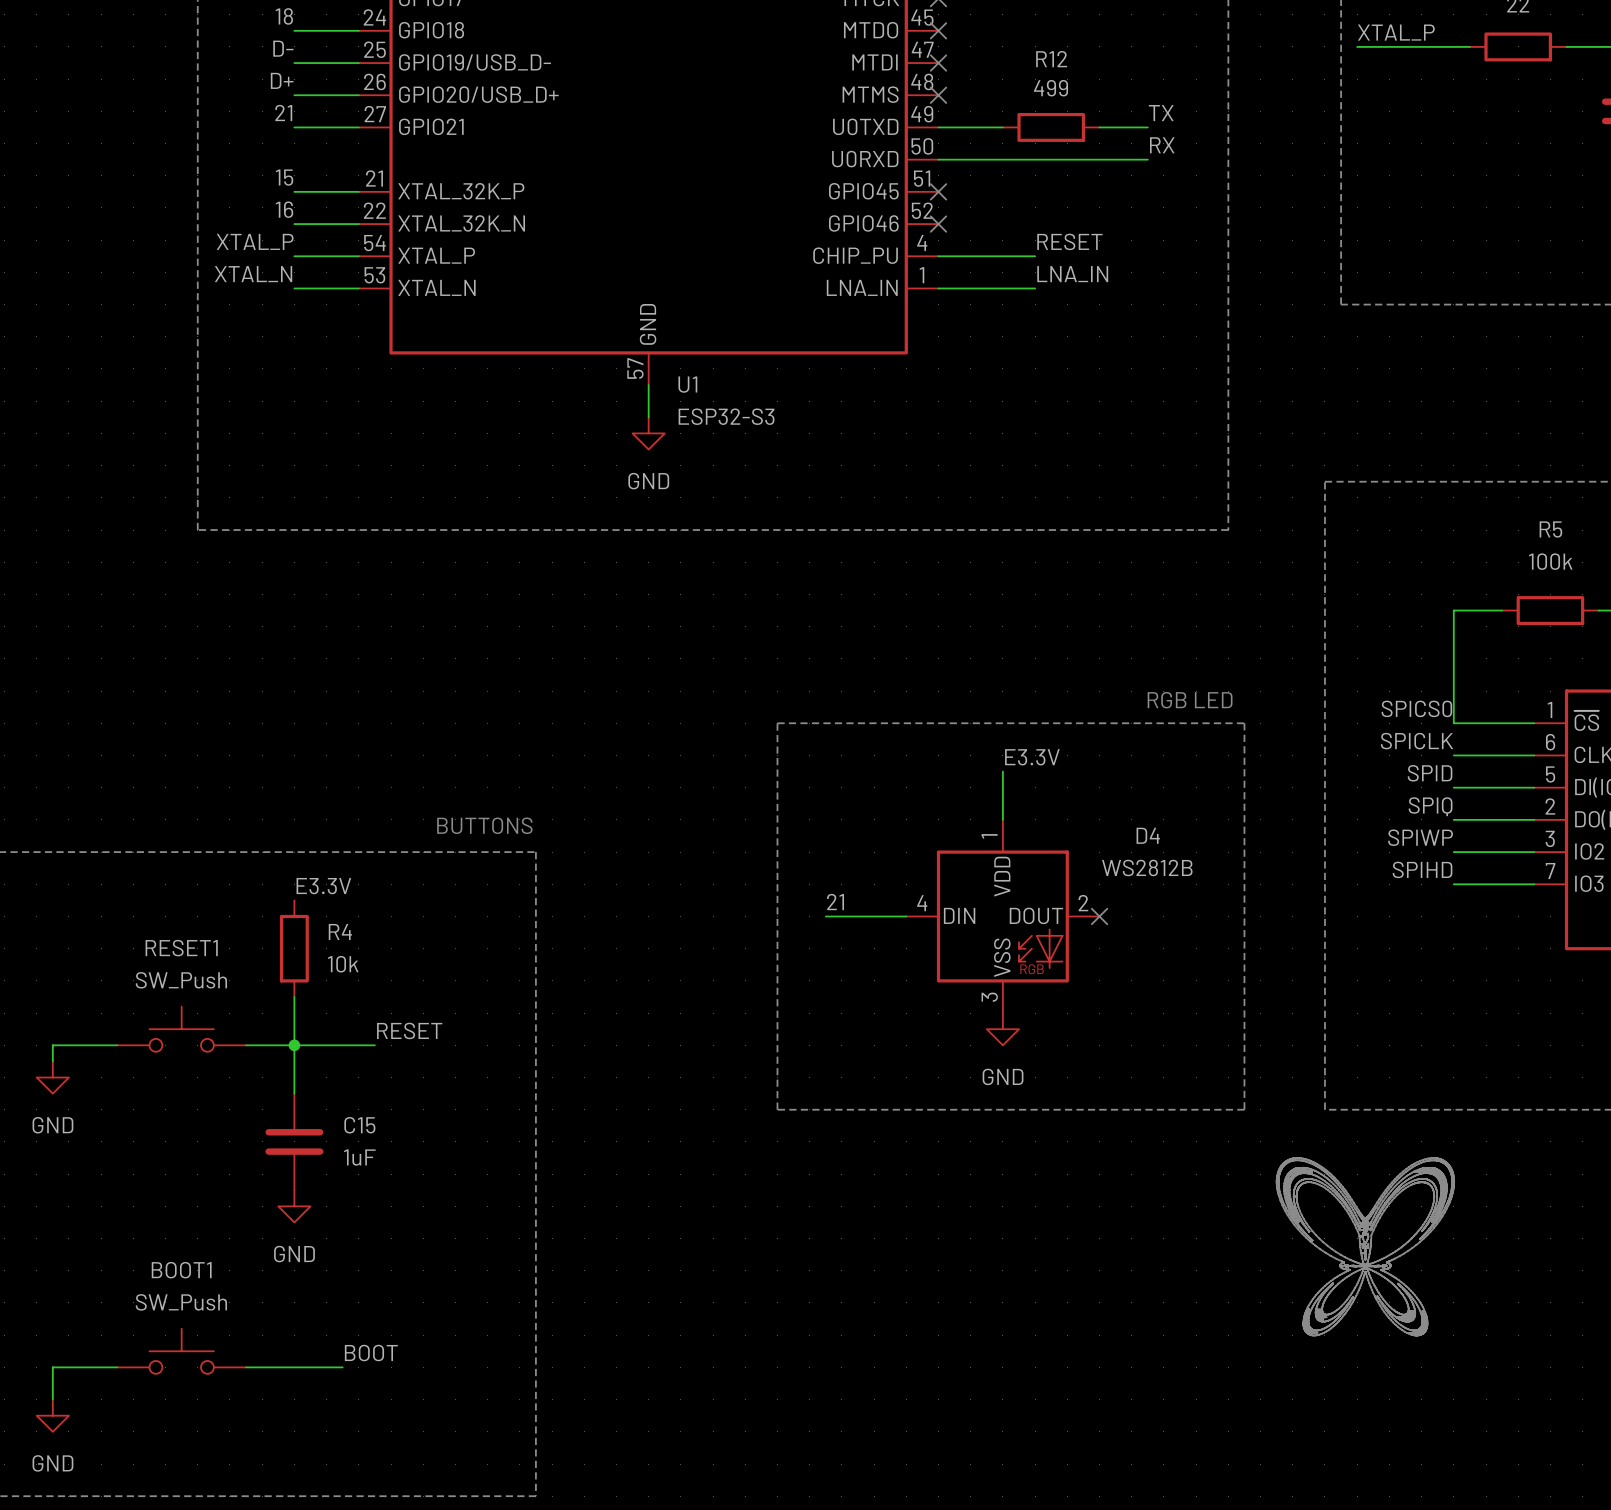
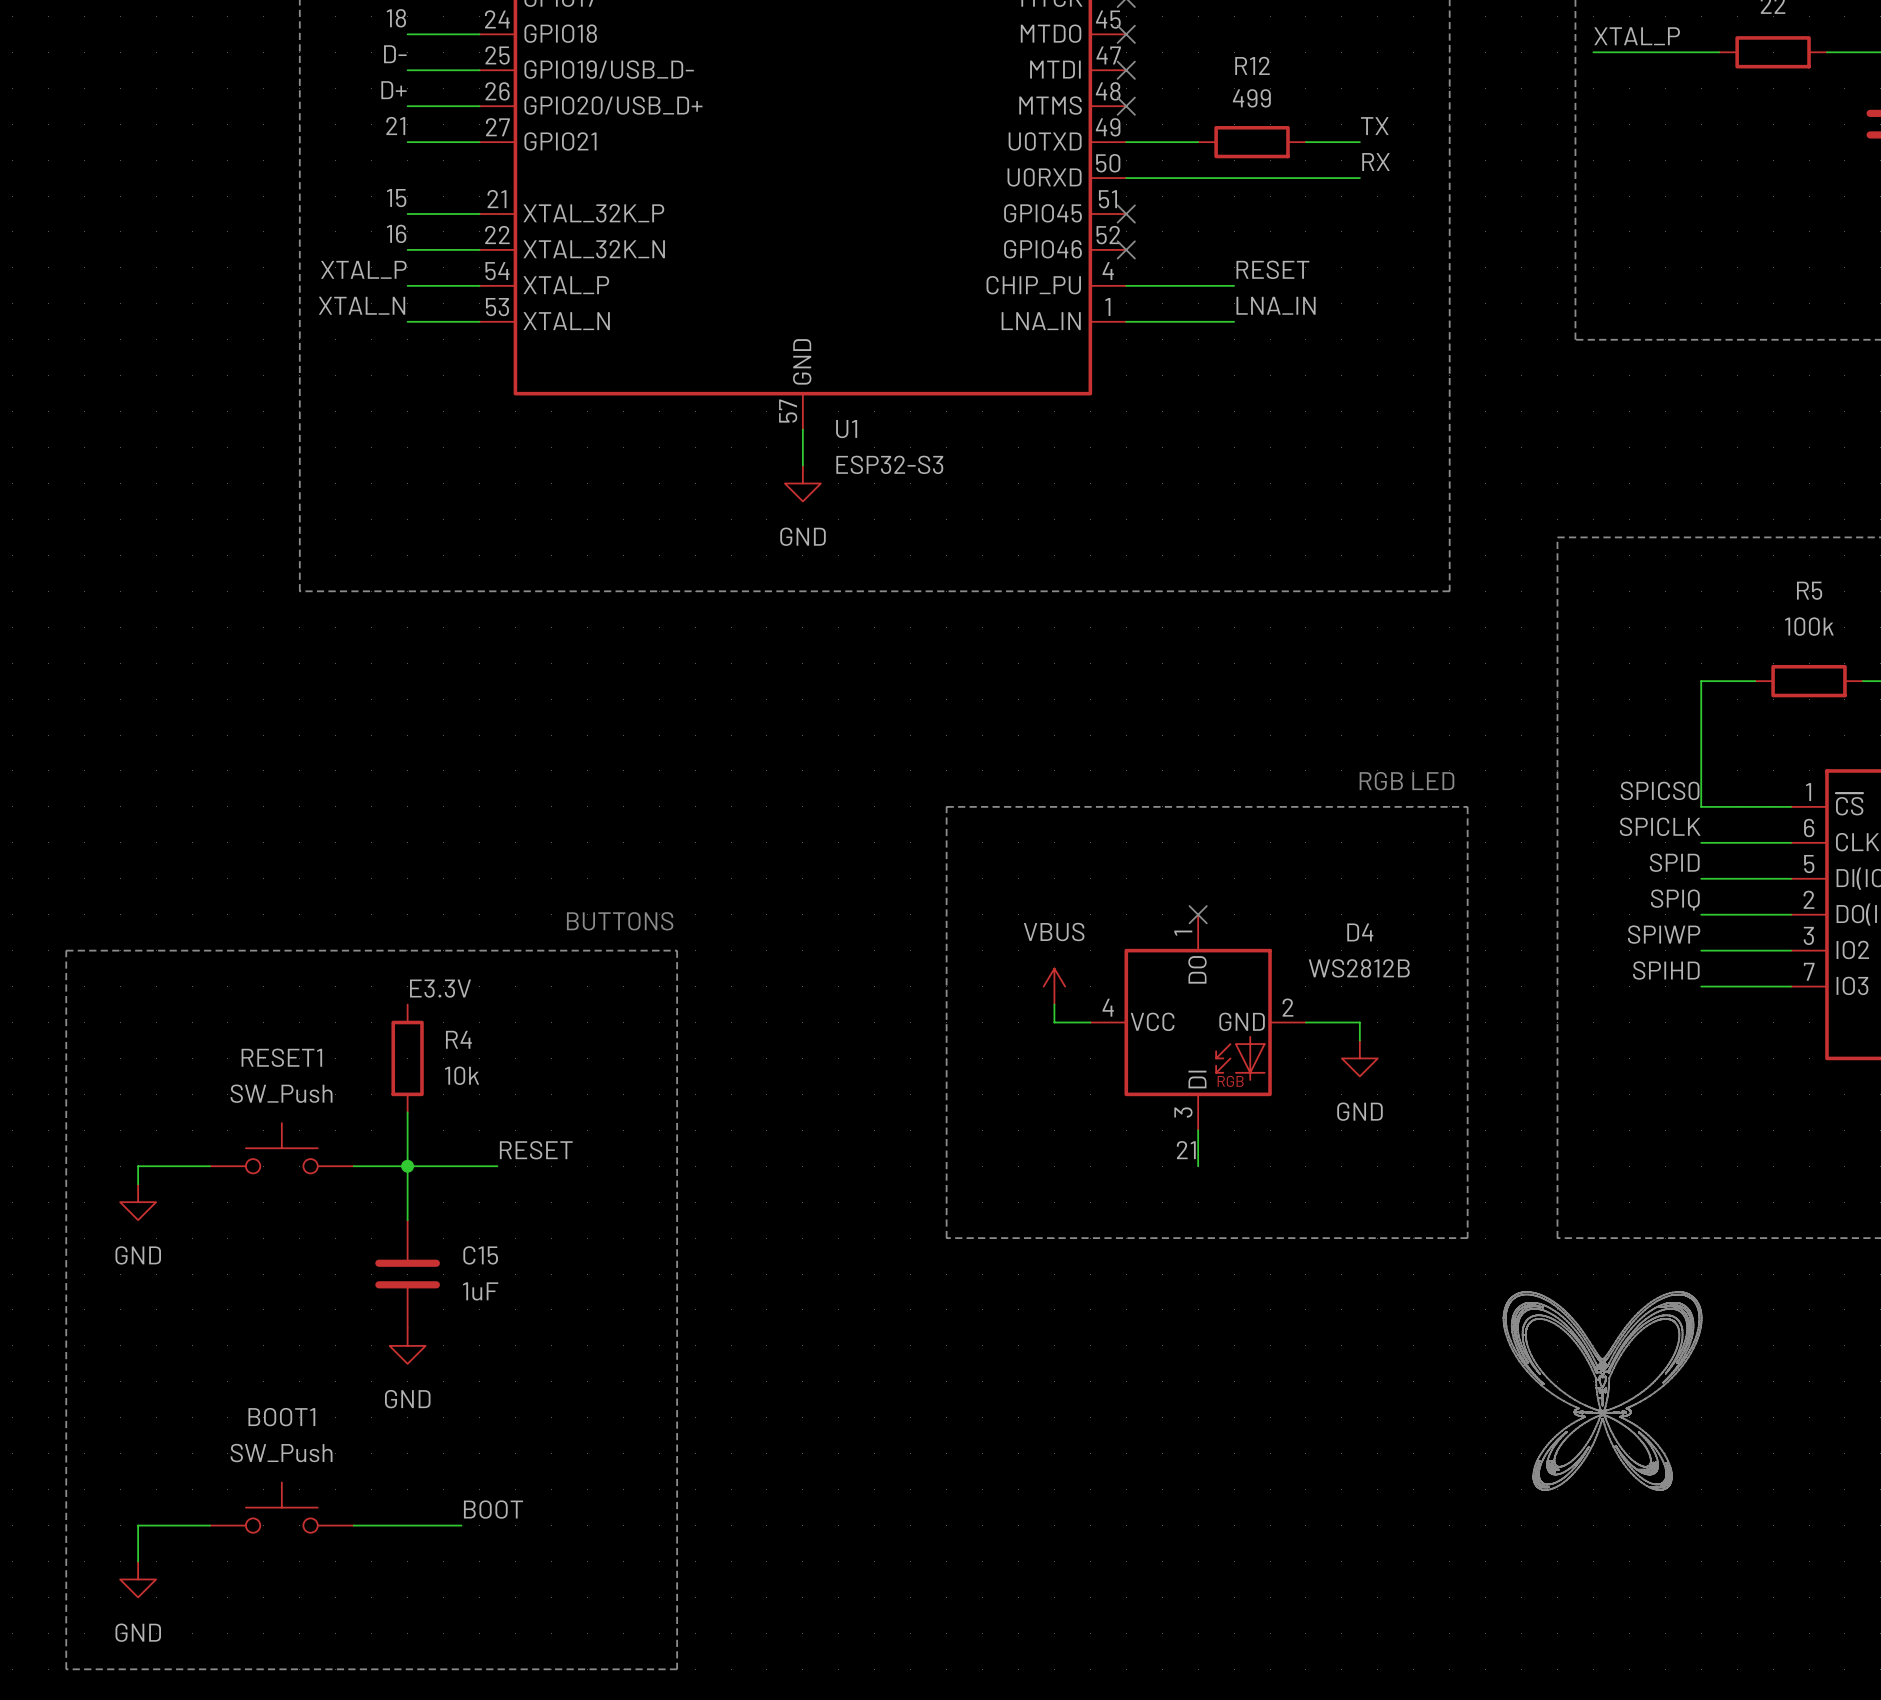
label: E3.3V (1032, 757) -> none
wire: (1002, 771) (1002, 819) -> none
no-connect mark: none -> (1198, 914)
D4 pin name: VDD (1002, 876) -> DO (1197, 969)
power symbol: none -> VBUS (1054, 986)
label position: 21 (835, 902) -> 21 (1186, 1150)
D4 pin name: DIN (959, 915) -> VCC (1152, 1021)
D4 pin name: DOUT (1036, 915) -> GND (1242, 1021)
wire: (825, 916) (874, 916) -> (1054, 1004) (1054, 1022)
wire: none -> (1305, 1022) (1359, 1022) (1359, 1040)
no-connect mark: (1099, 916) -> none
D4 pin name: VSS (1002, 957) -> DI (1197, 1079)
power symbol position: GND (1002, 1029) -> GND (1359, 1058)

